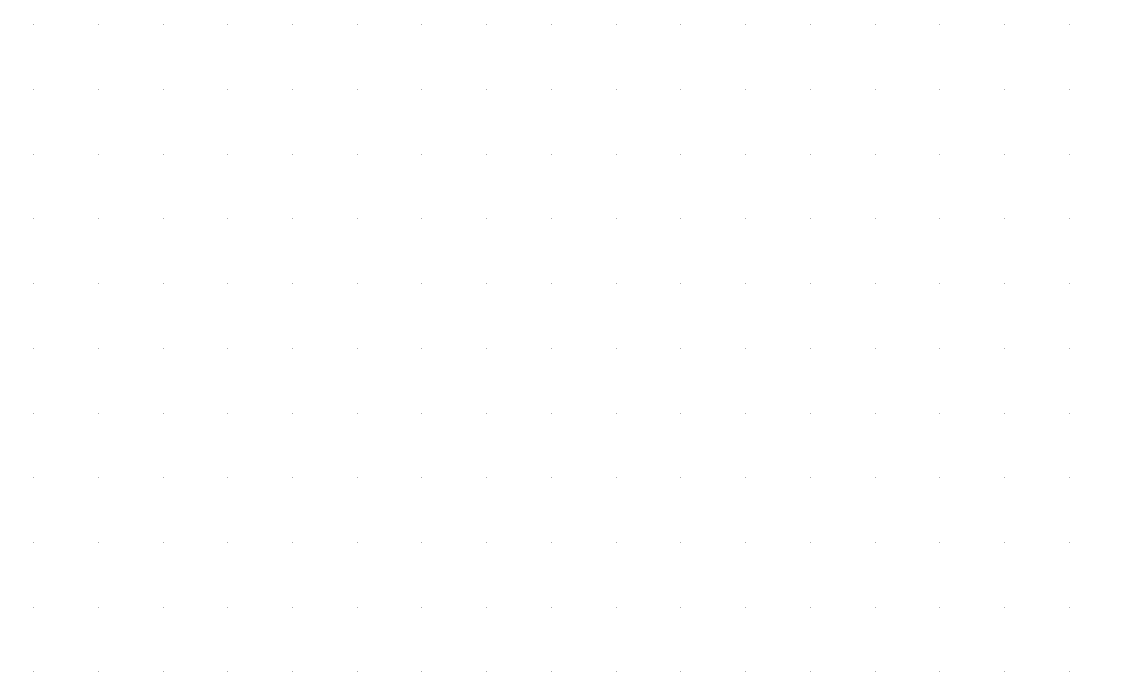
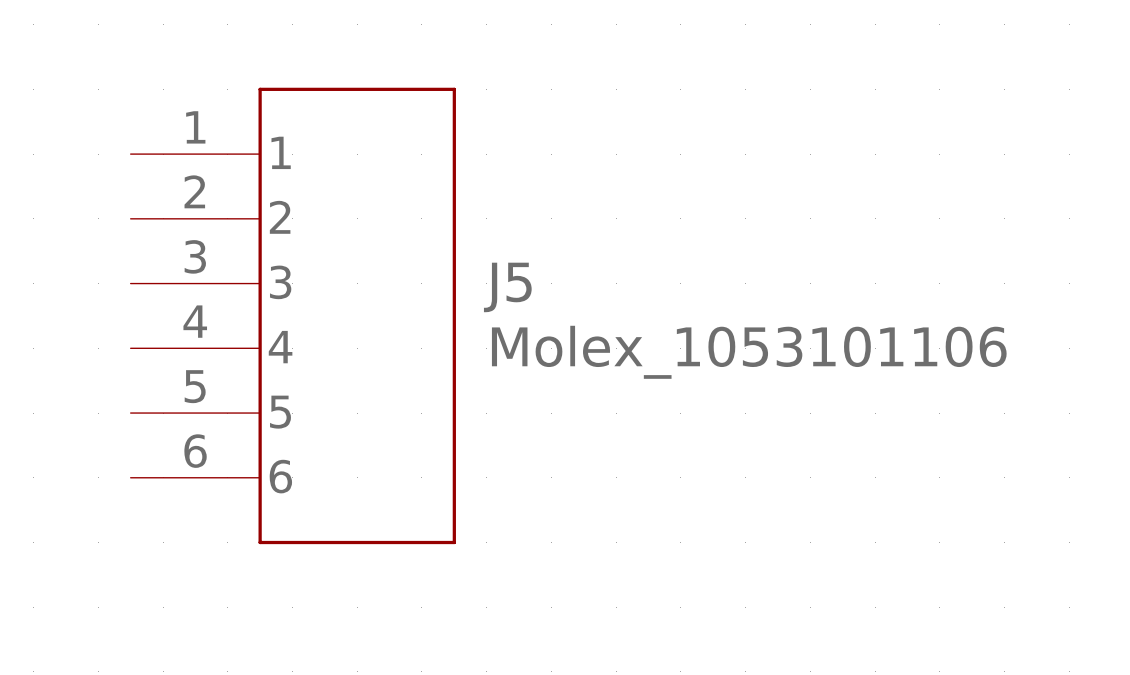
J5: none -> Molex_1053101106 (293, 315)

